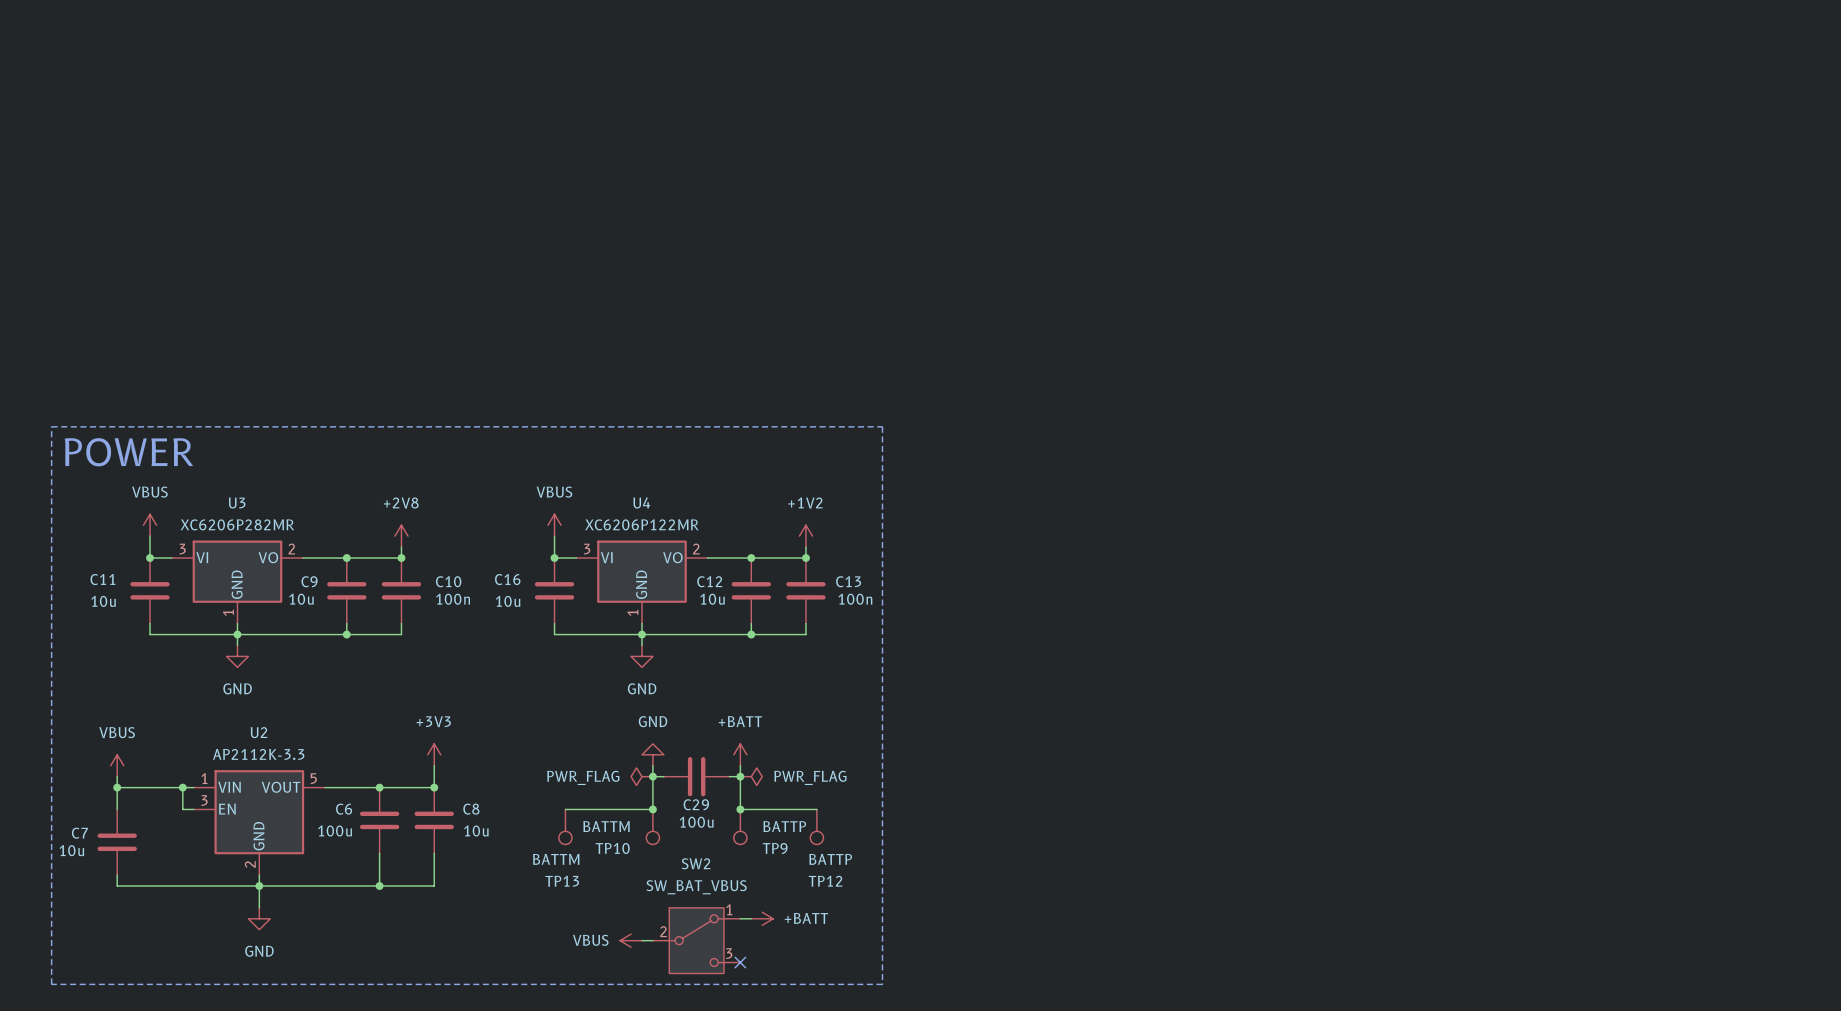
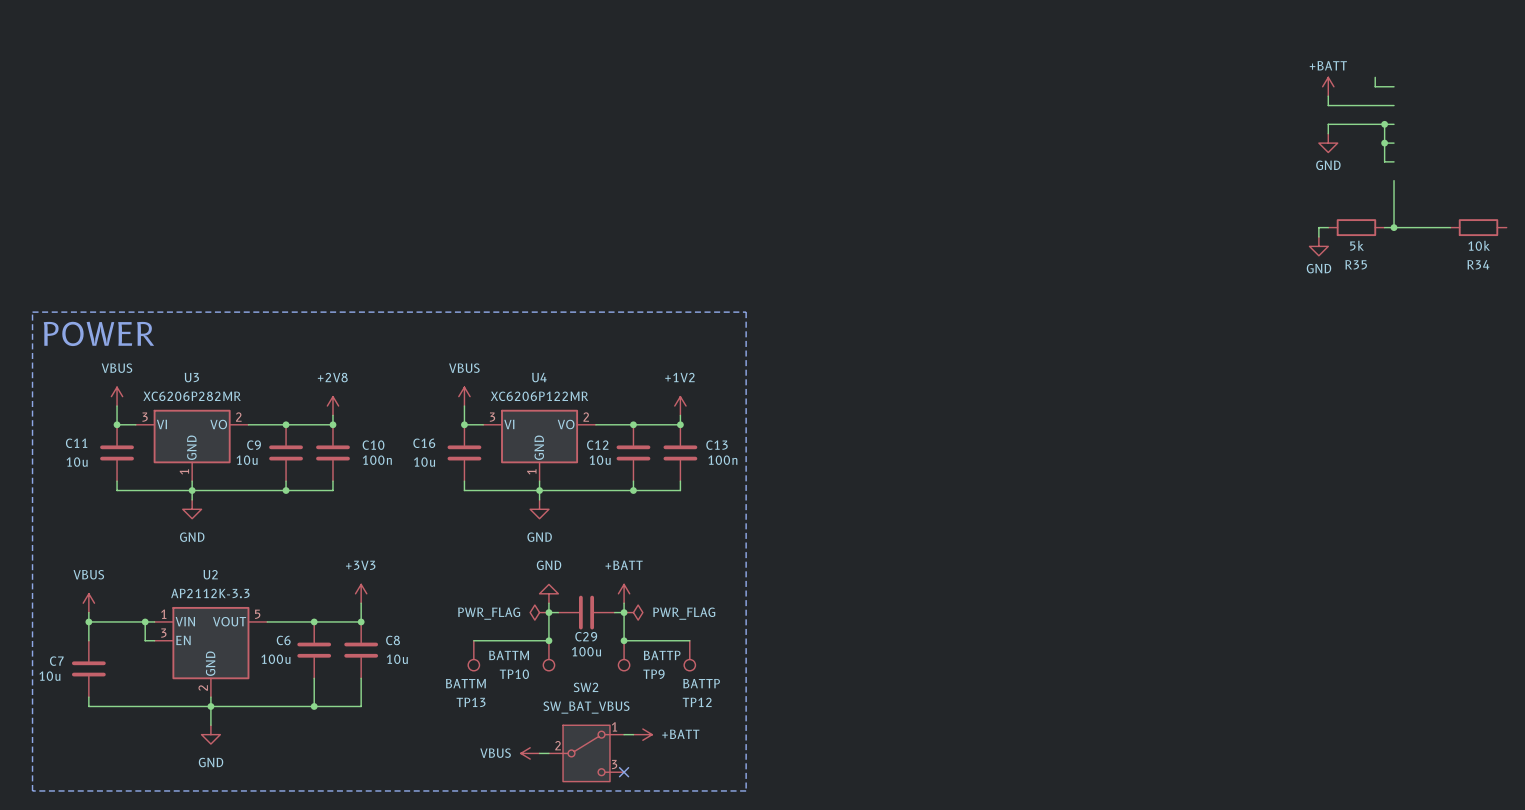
wire: none -> (1375, 77) (1375, 86) (1394, 86)
power symbol: none -> +BATT (1328, 86)
wire: none -> (1328, 96) (1328, 105) (1394, 105)
wire: none -> (1384, 124) (1384, 161) (1394, 161)
junction: none -> (1384, 124)
wire: none -> (1394, 124) (1328, 124) (1328, 133)
power symbol: none -> GND (1328, 143)
wire: none -> (1384, 143) (1394, 143)
junction: none -> (1384, 143)
wire: none -> (1394, 180) (1394, 227)
wire: none -> (1328, 227) (1318, 227) (1318, 237)
R35: none -> 5k (1356, 227)
wire: none -> (1384, 227) (1450, 227)
junction: none -> (1394, 227)
R34: none -> 10k (1478, 227)
power symbol: none -> GND (1318, 246)

